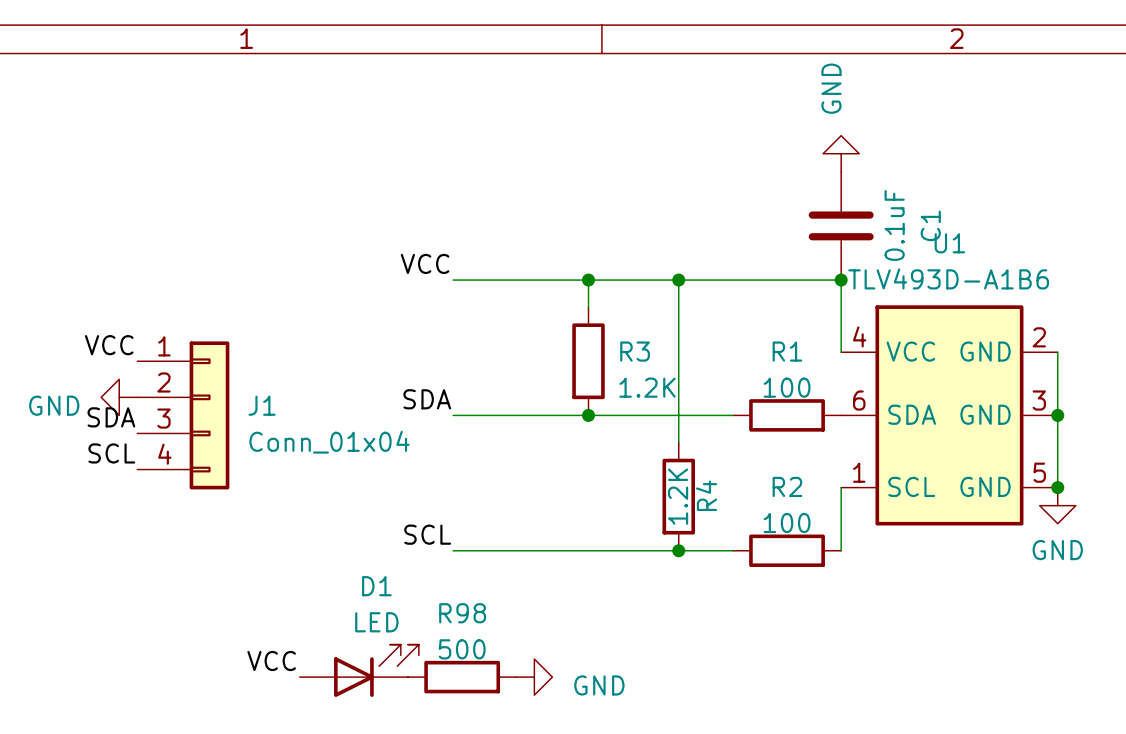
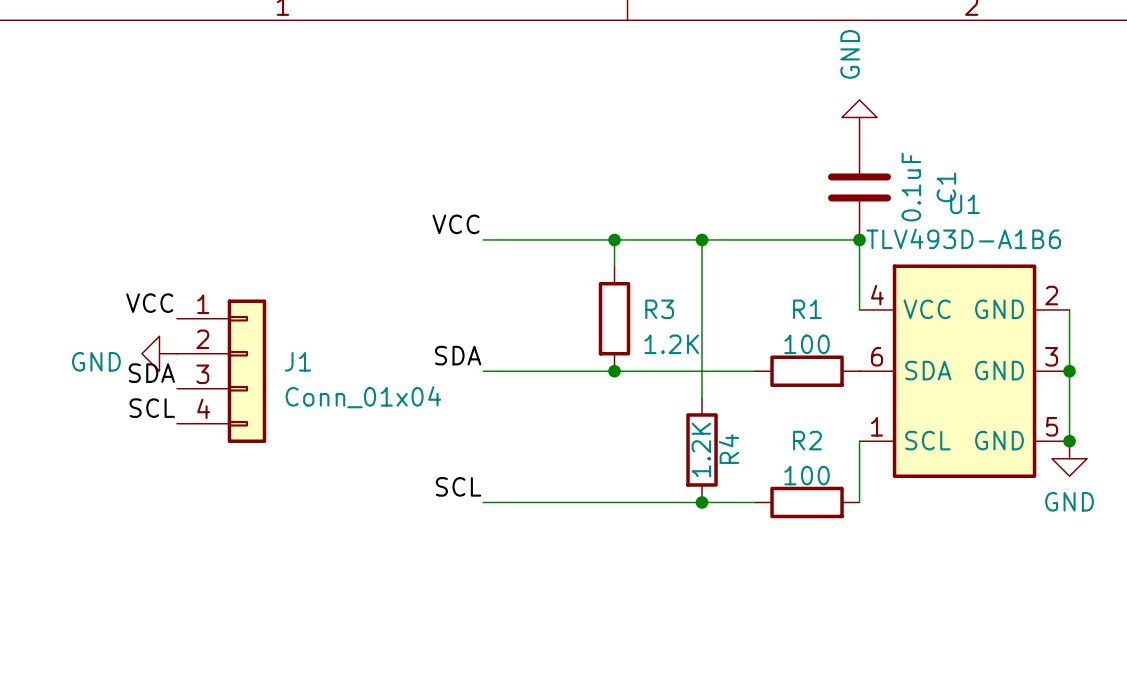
label: VCC (271, 661) -> none
D1: LED (359, 670) -> none
R98: 500 (462, 677) -> none
power symbol: GND (534, 677) -> none

